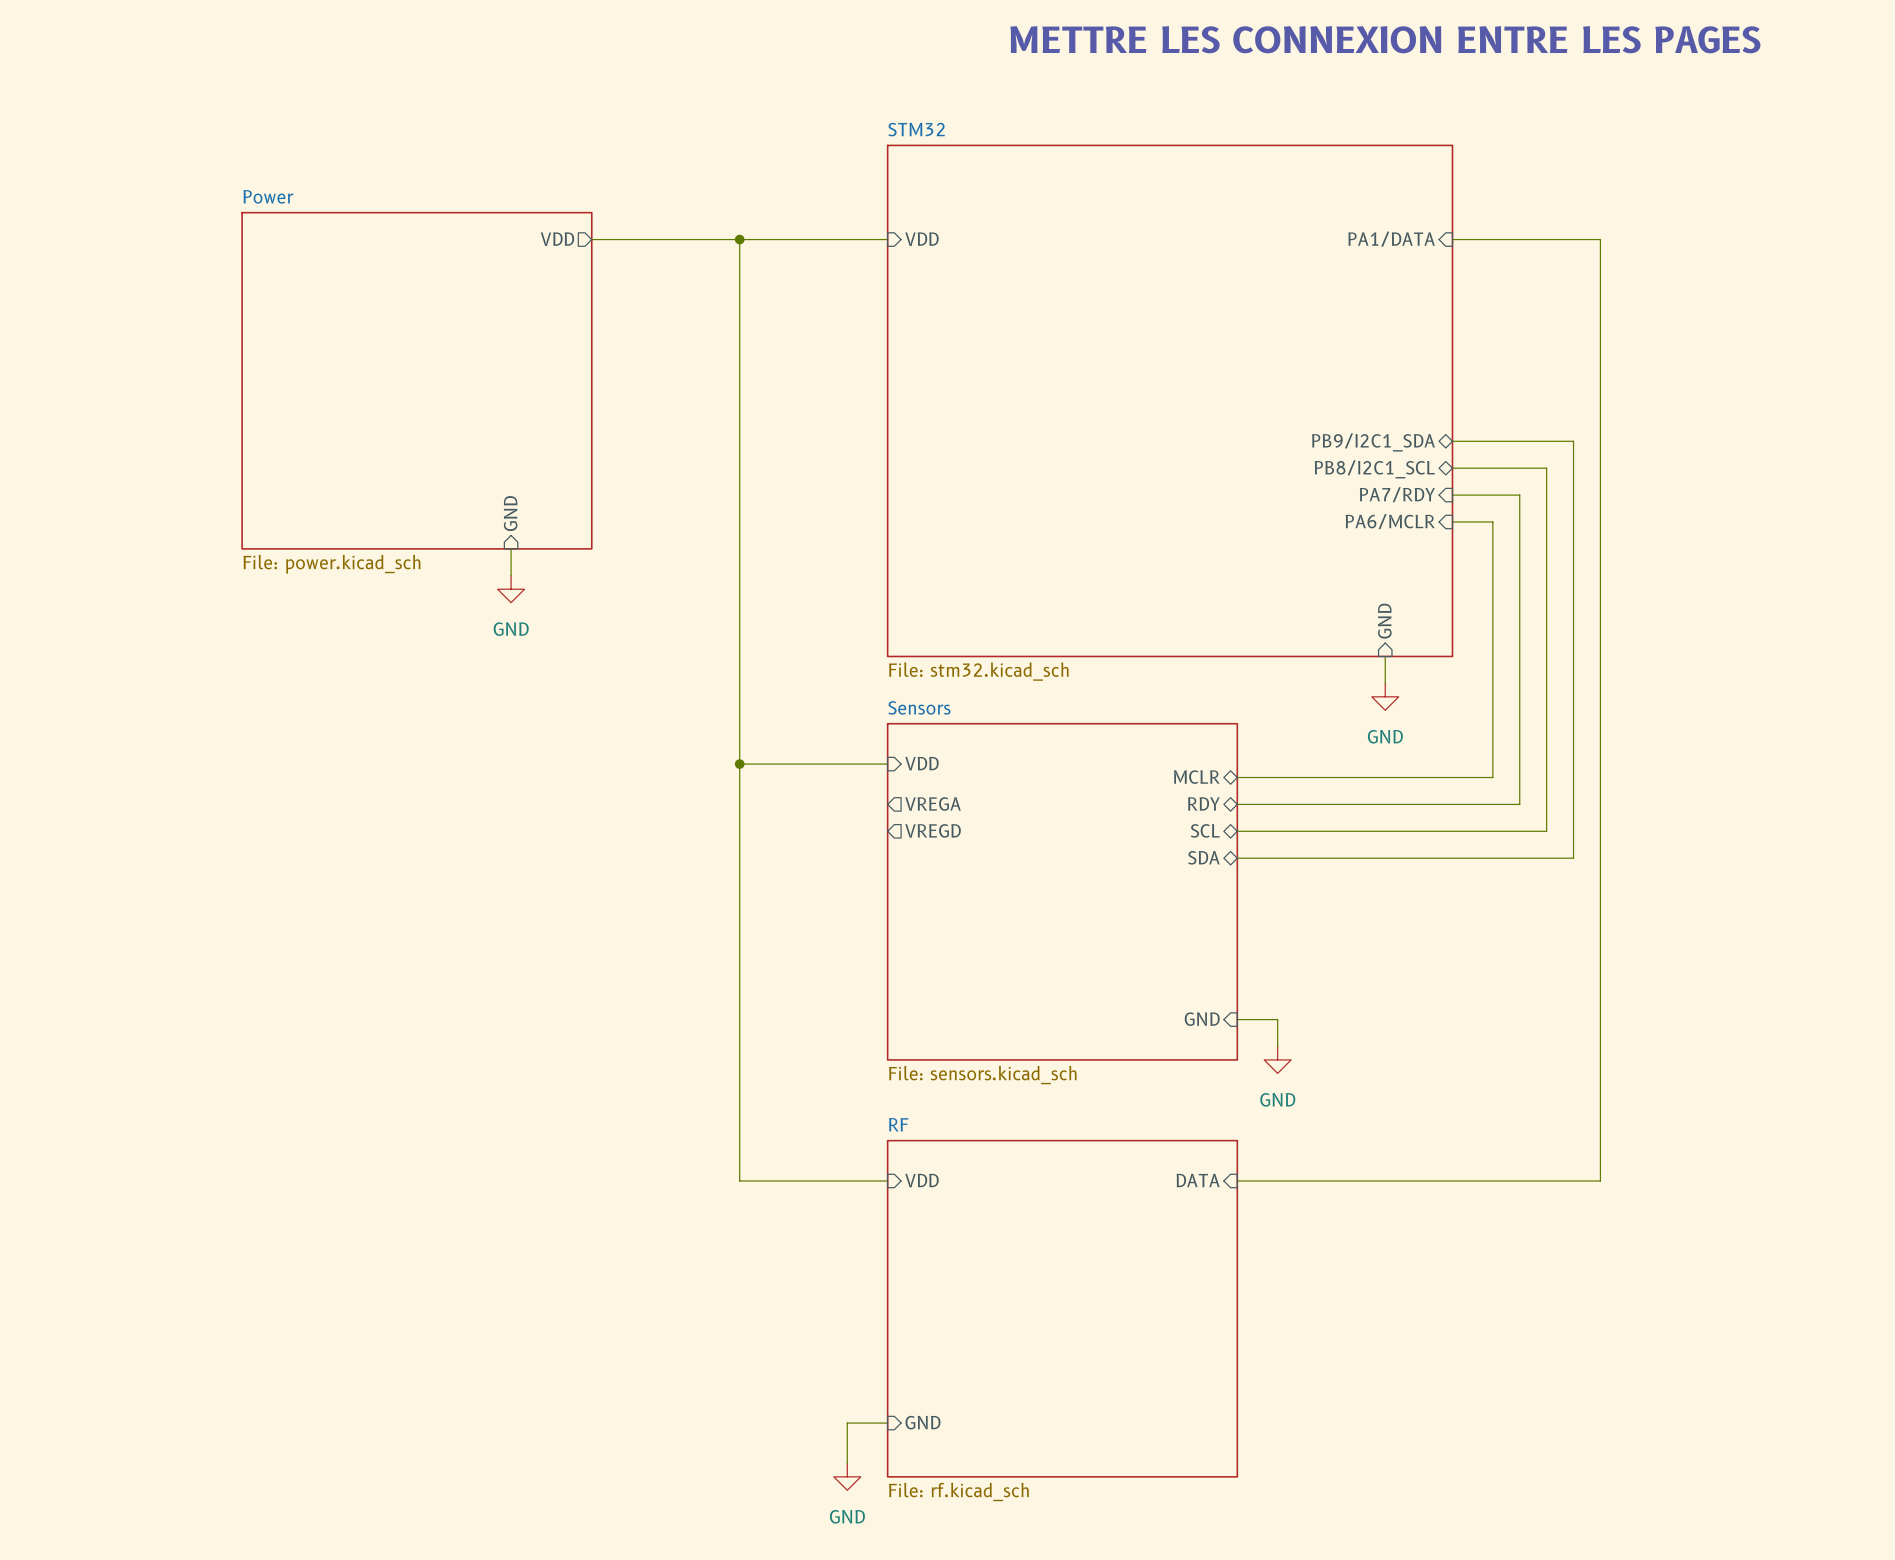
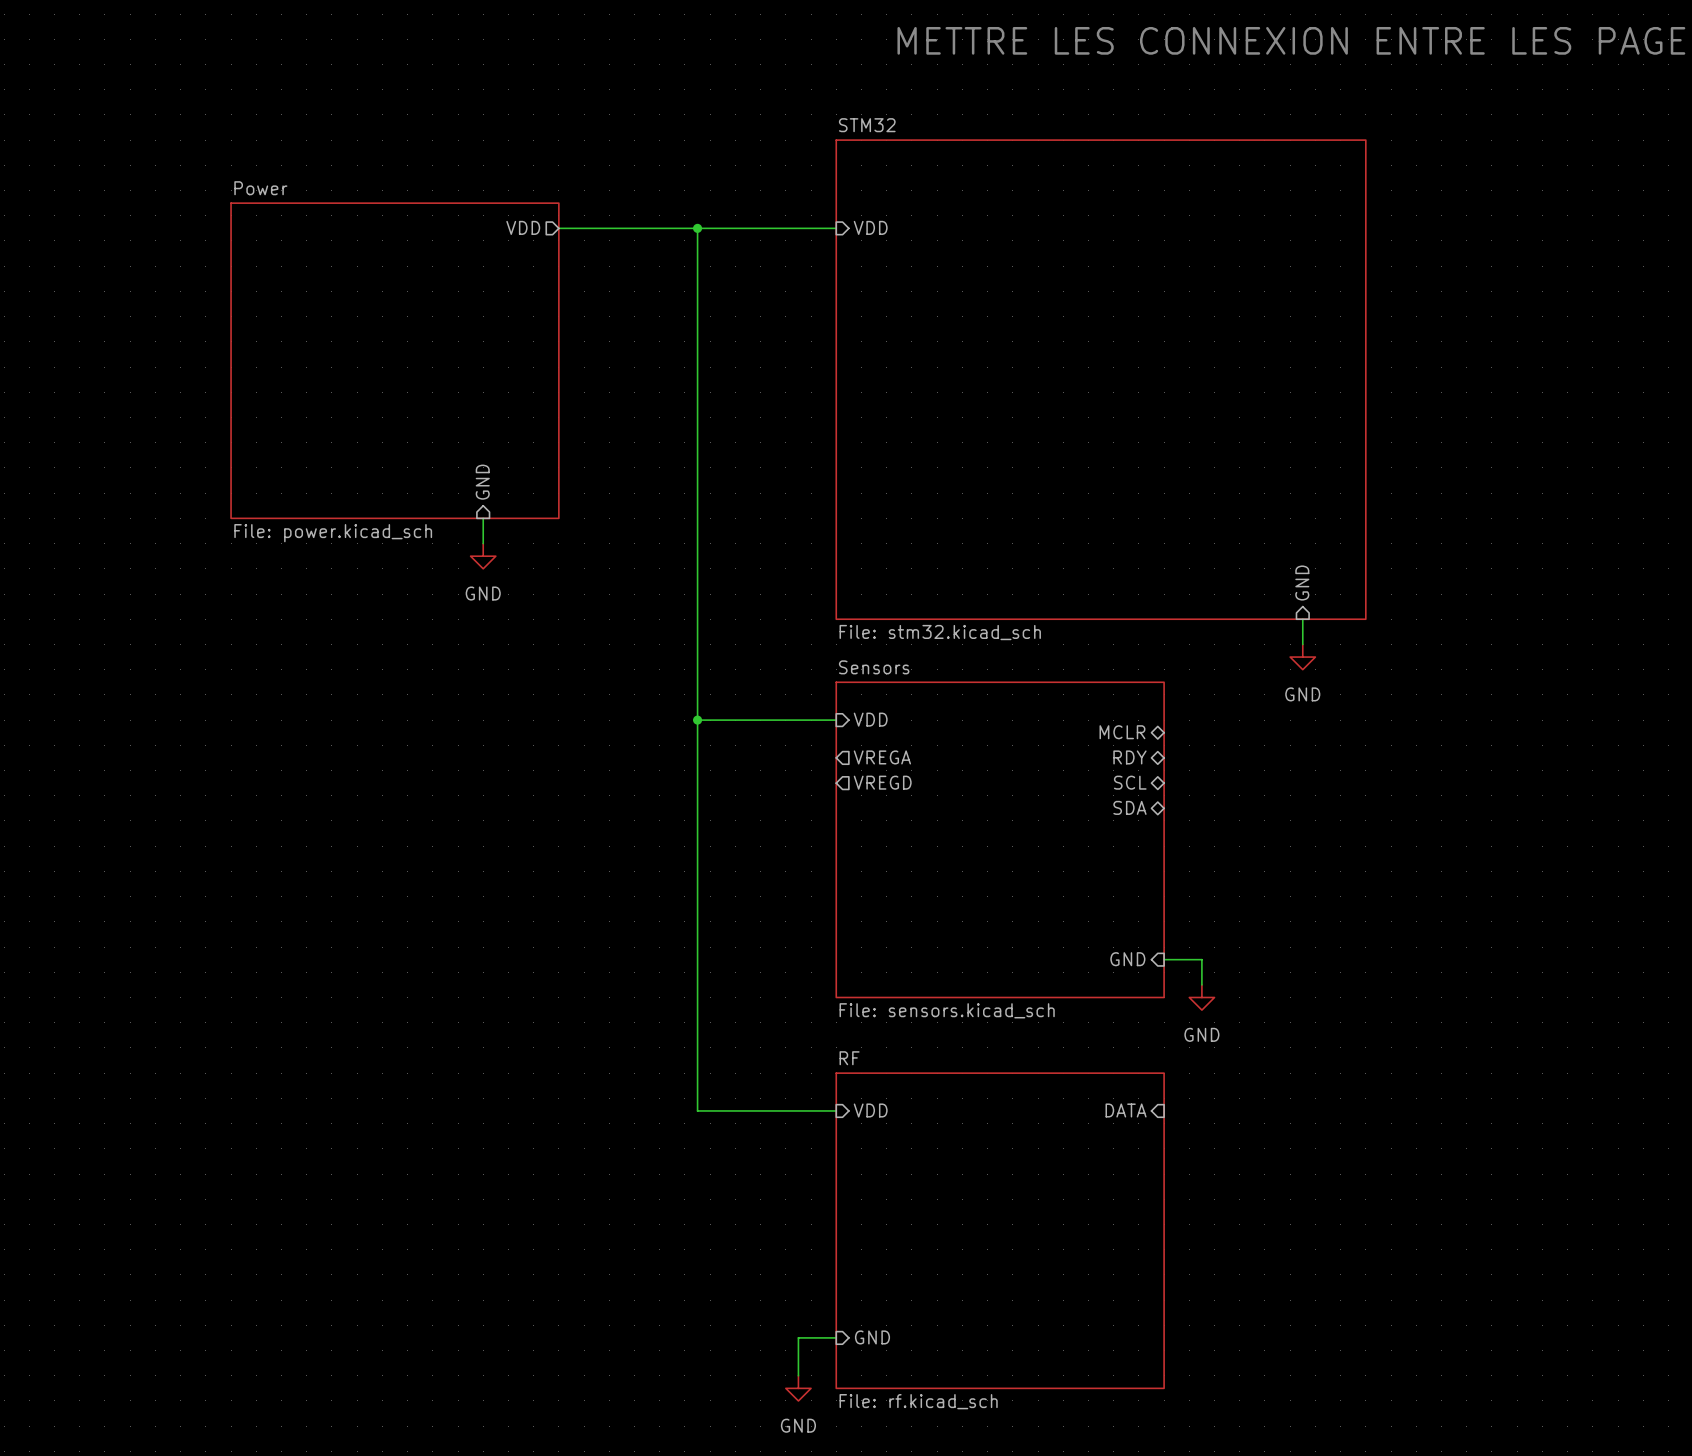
sheet pin: PA1/DATA (1391, 239) -> none
wire: (1452, 239) (1600, 239) (1600, 1180) (1237, 1180) -> none
wire: (1452, 441) (1573, 441) (1573, 858) (1237, 858) -> none
sheet pin: PB9/I2C1_SDA (1373, 442) -> none
wire: (1452, 468) (1546, 468) (1546, 831) (1237, 831) -> none
sheet pin: PB8/I2C1_SCL (1374, 469) -> none
sheet pin: PA7/RDY (1397, 494) -> none
wire: (1452, 495) (1519, 495) (1519, 804) (1237, 804) -> none
sheet pin: PA6/MCLR (1390, 521) -> none
wire: (1452, 521) (1492, 521) (1492, 777) (1237, 777) -> none

